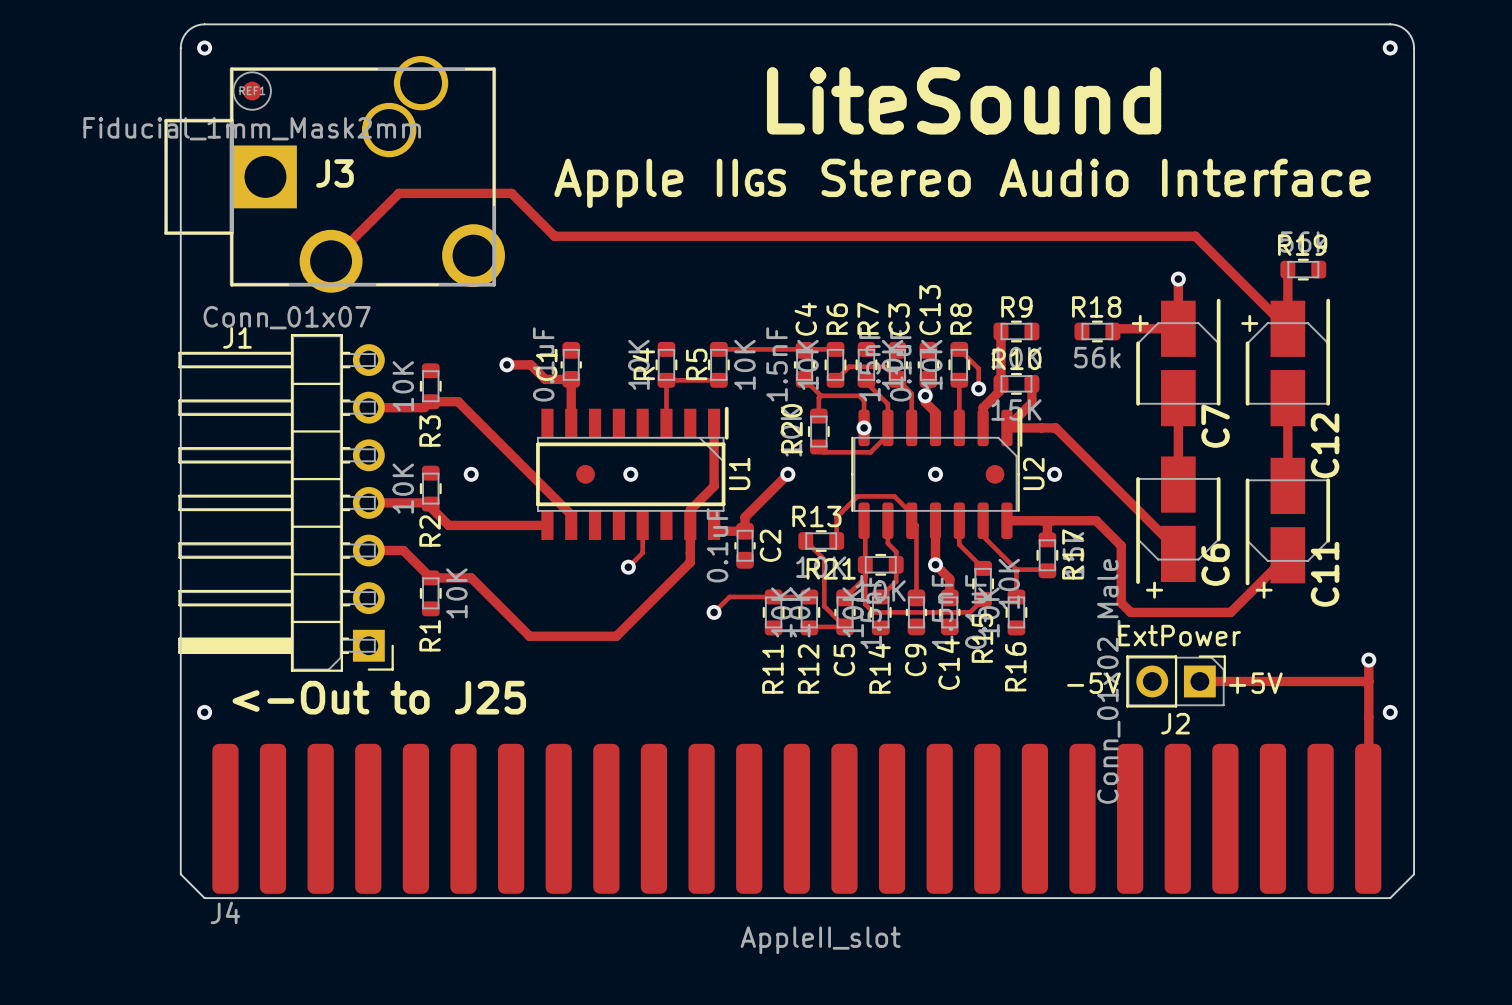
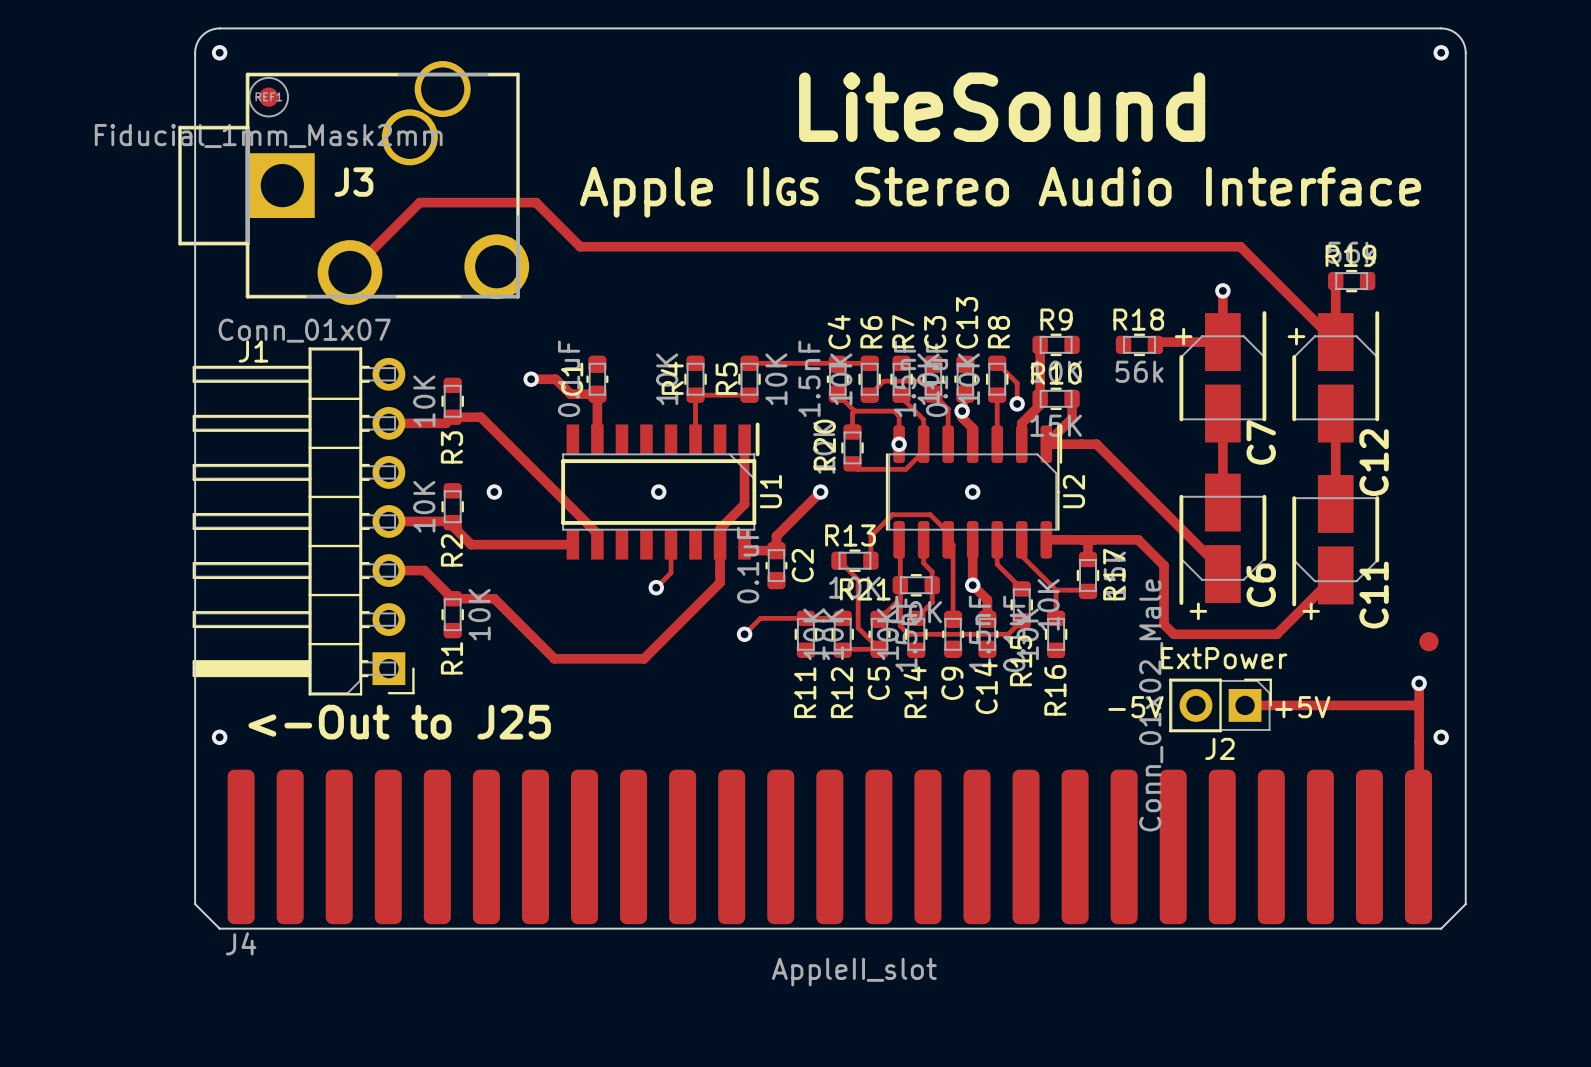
part: (585, 474) -> none
part: (995, 474) -> none
via: (1054, 474) -> none
part: none -> (1428, 641)

